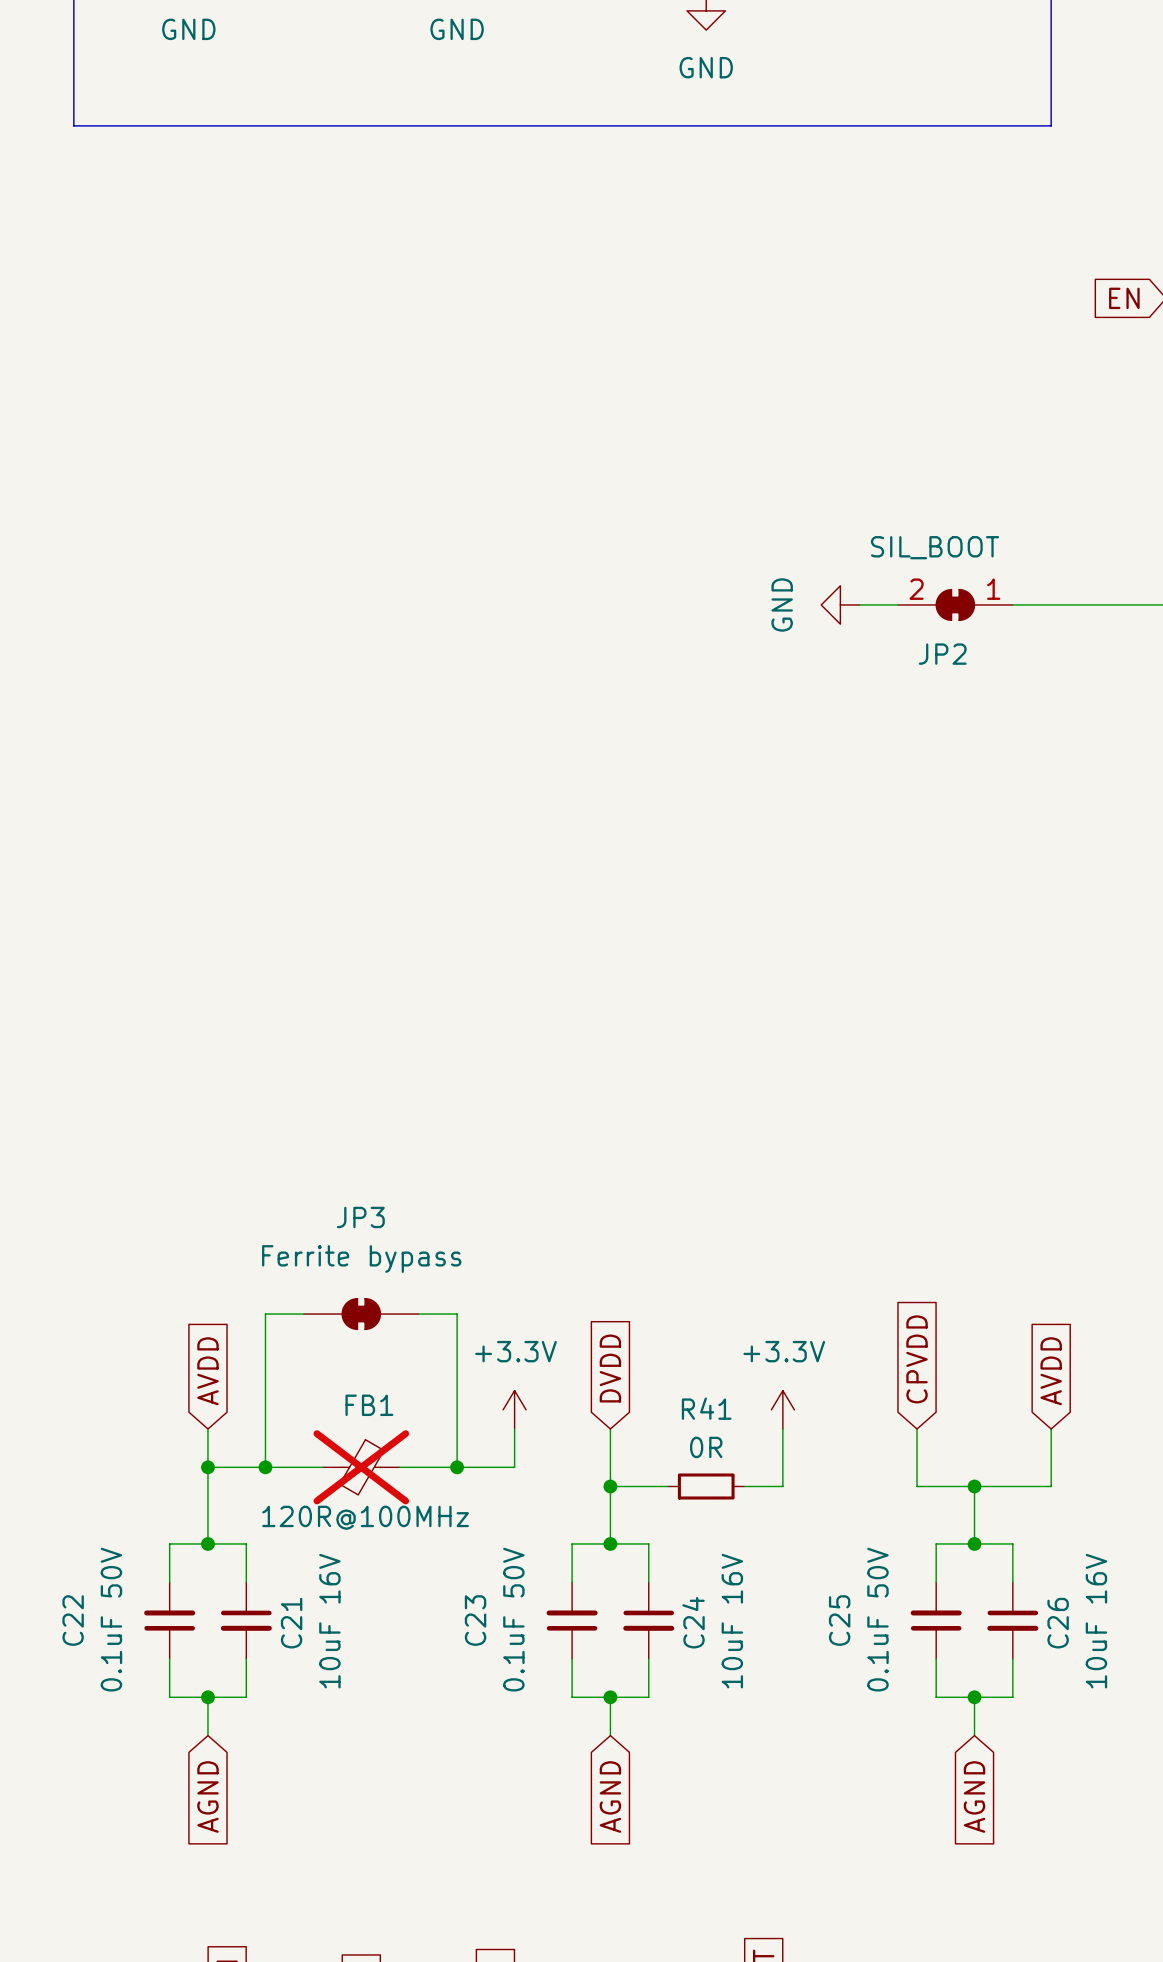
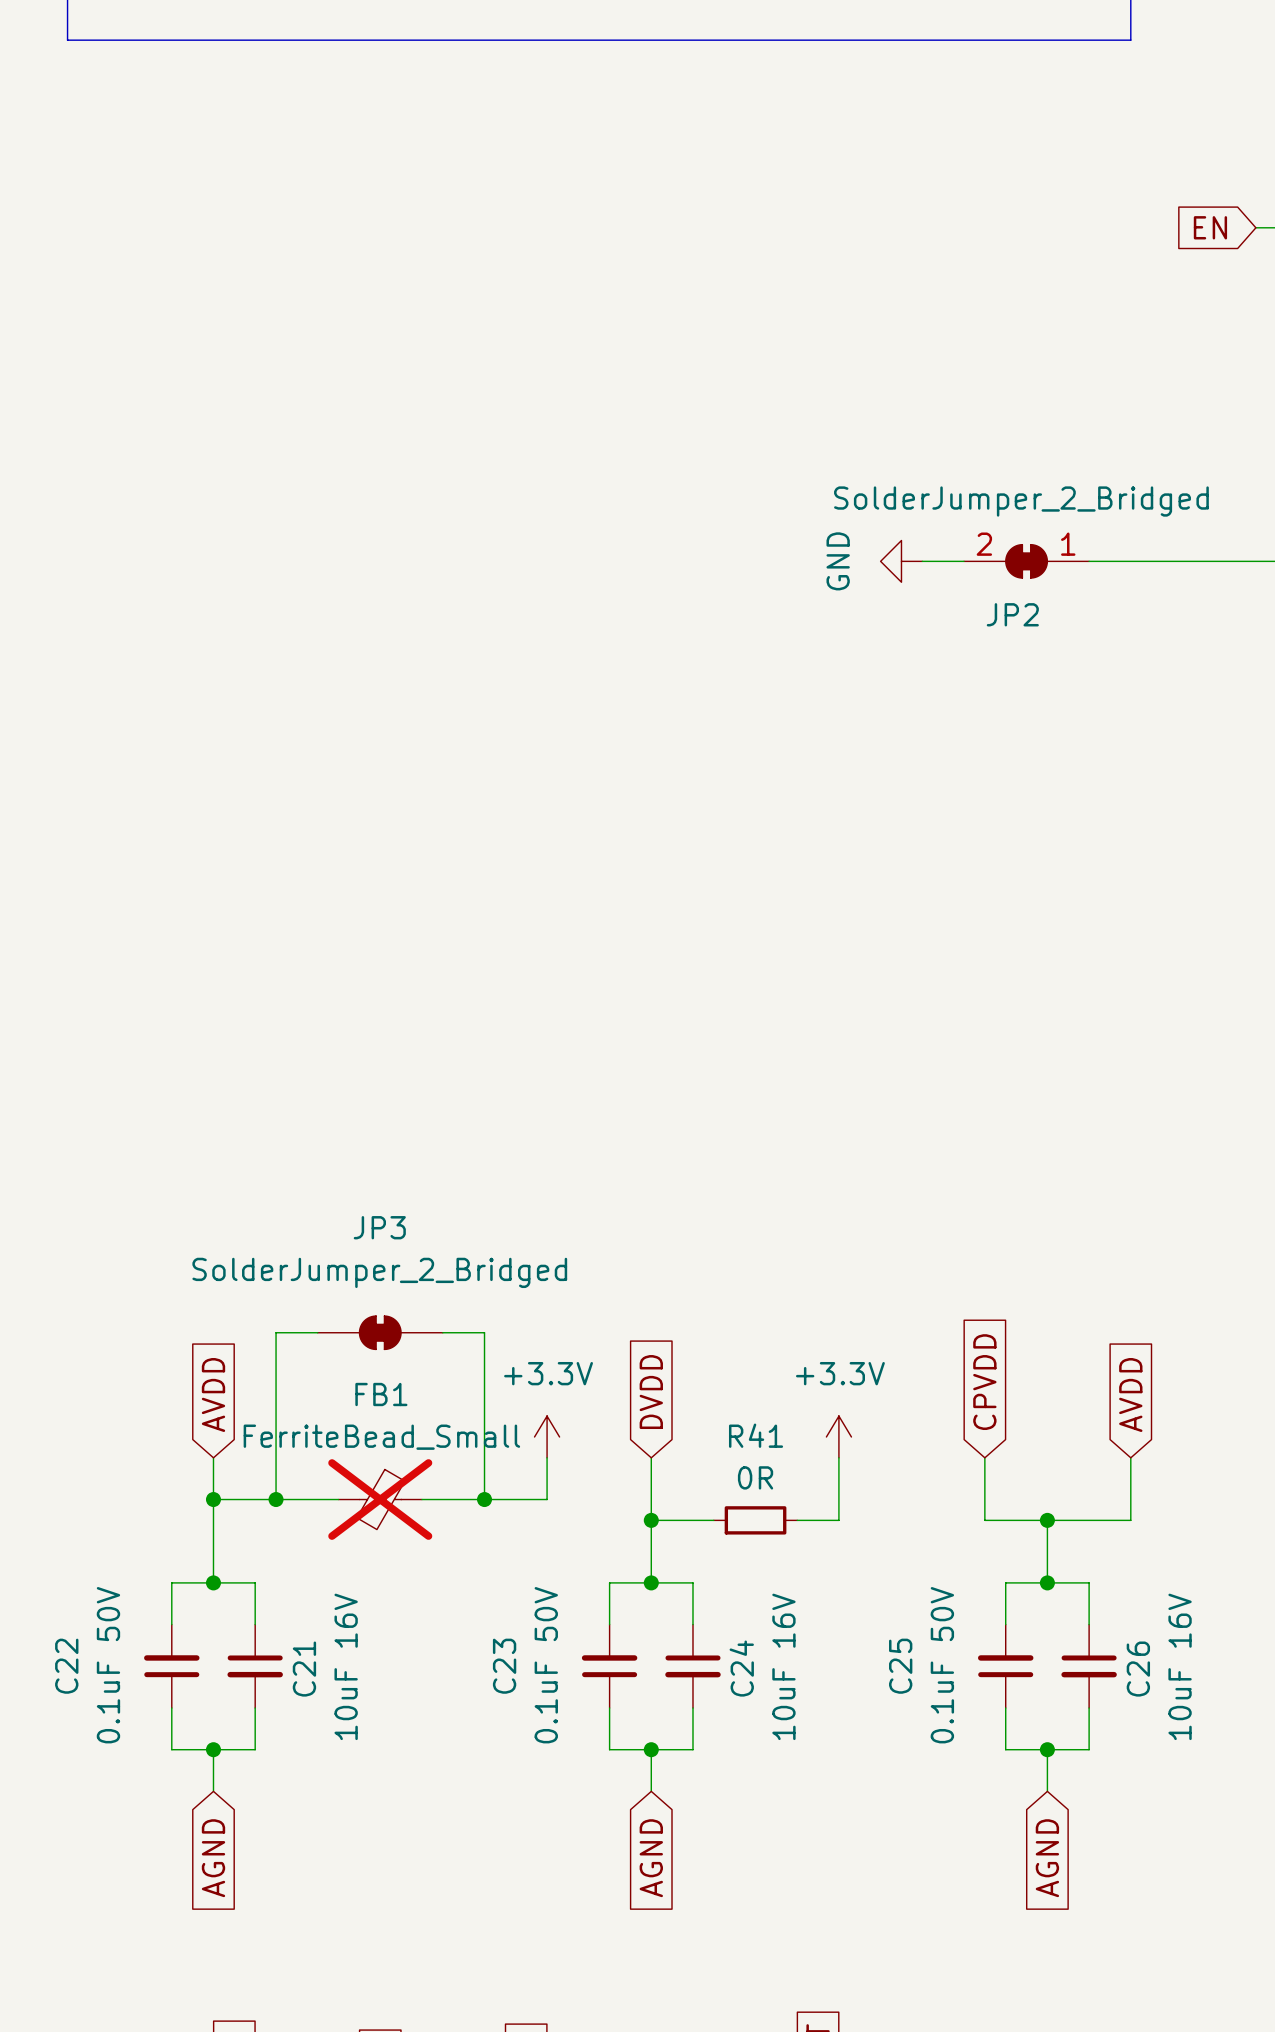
JP2 value: SIL_BOOT (935, 547) -> SolderJumper_2_Bridged (1021, 501)
JP3 value: Ferrite bypass (361, 1259) -> SolderJumper_2_Bridged (379, 1272)
FB1 name position: FB1 (369, 1405) -> FB1 (381, 1394)
FB1 value: 120R@100MHz (365, 1517) -> FerriteBead_Small (381, 1437)

